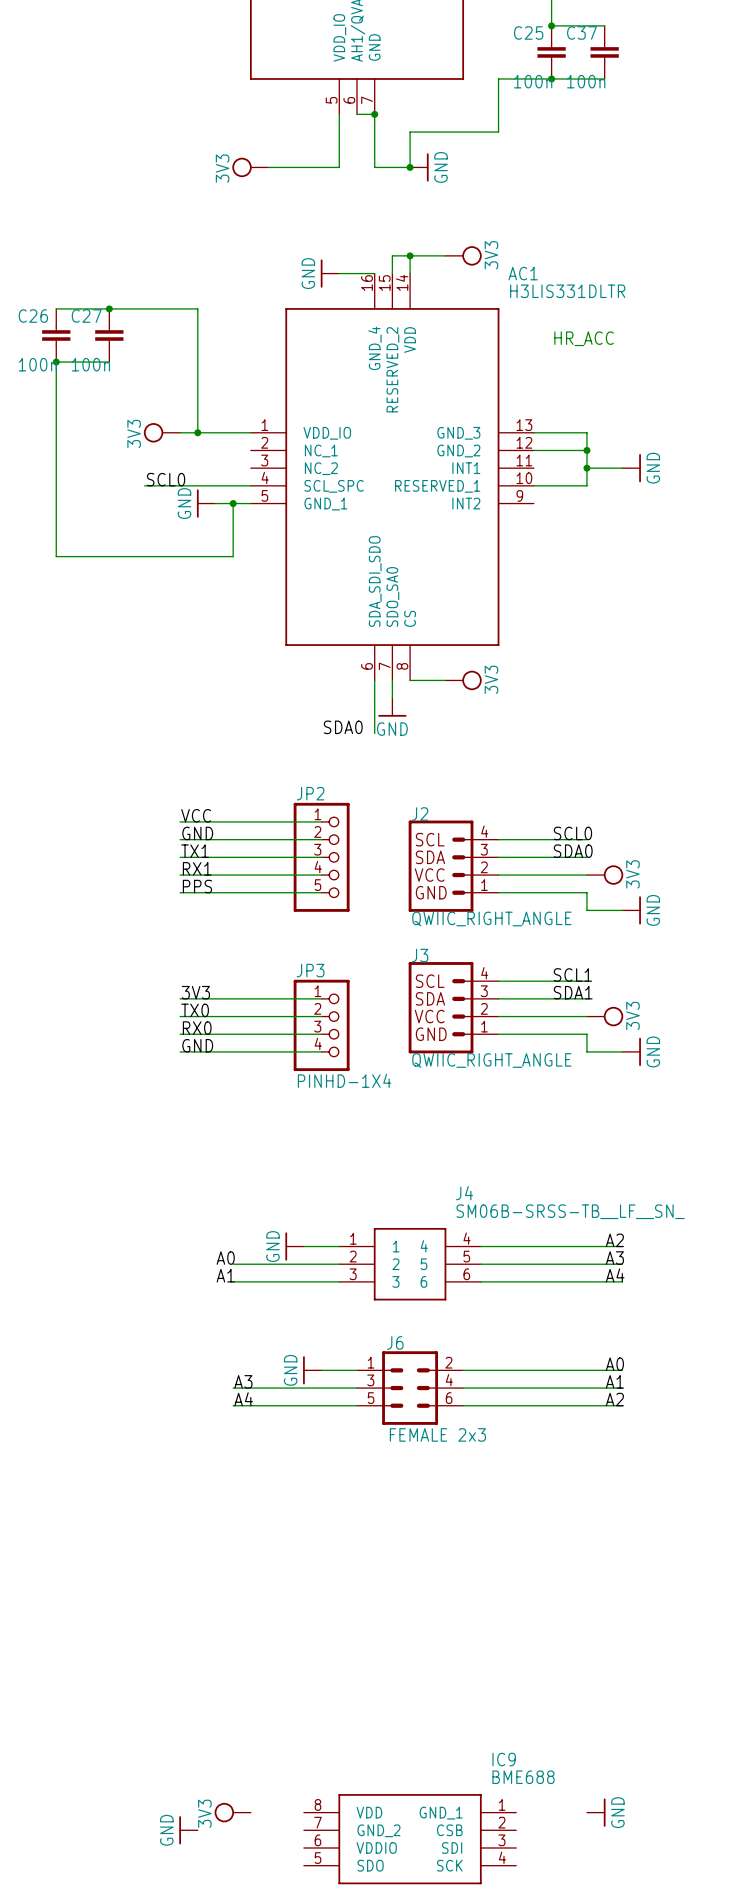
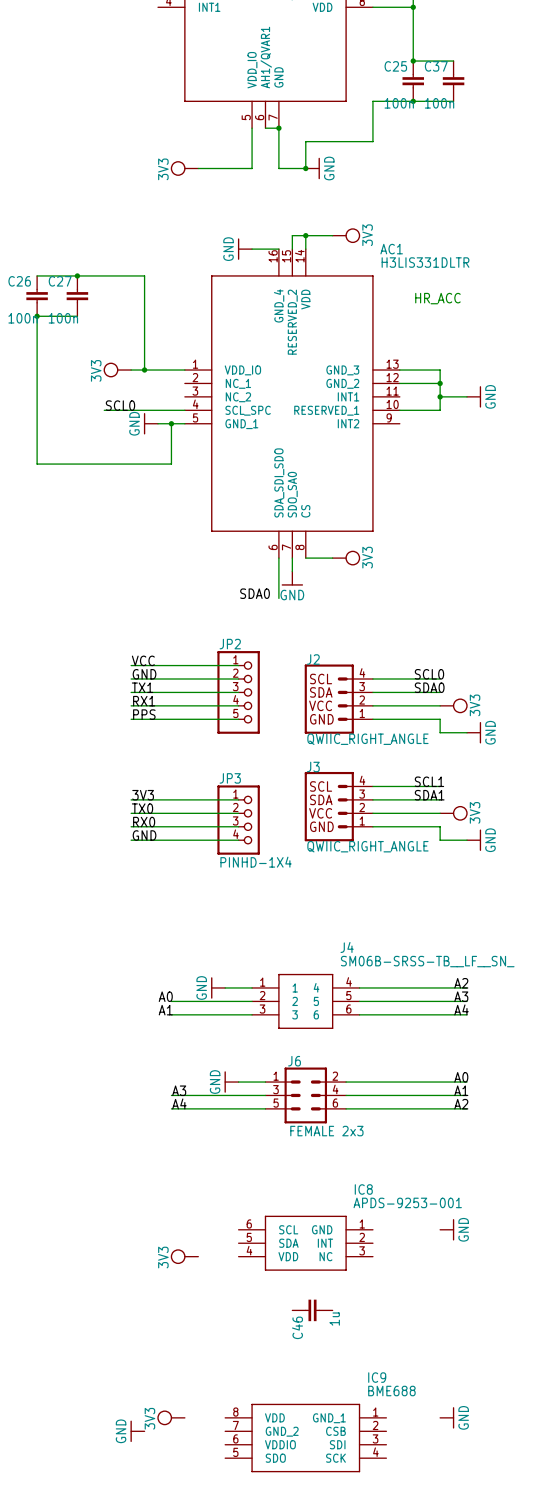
power symbol: none -> GND (447, 1229)
IC8: none -> APDS-9253-001 (305, 1243)
power symbol: none -> 3V3 (184, 1256)
C46: none -> 1u (312, 1310)

